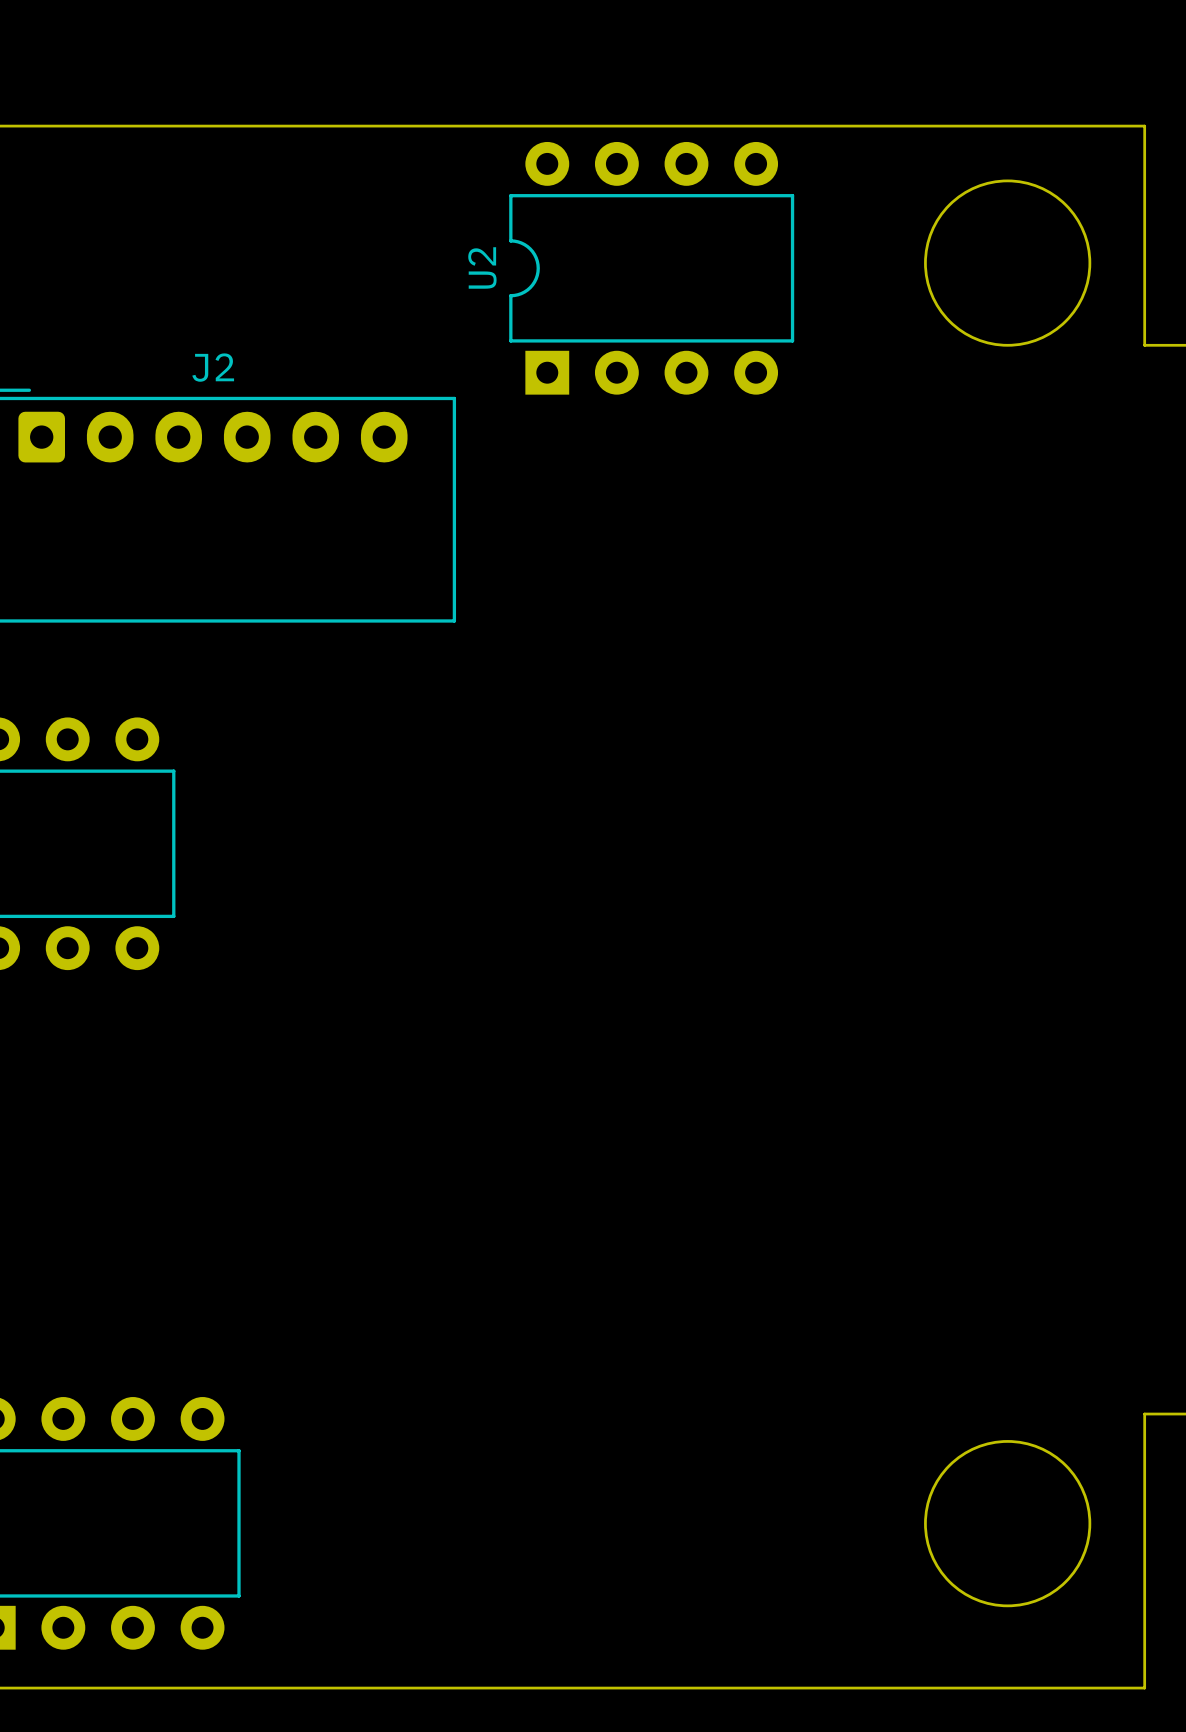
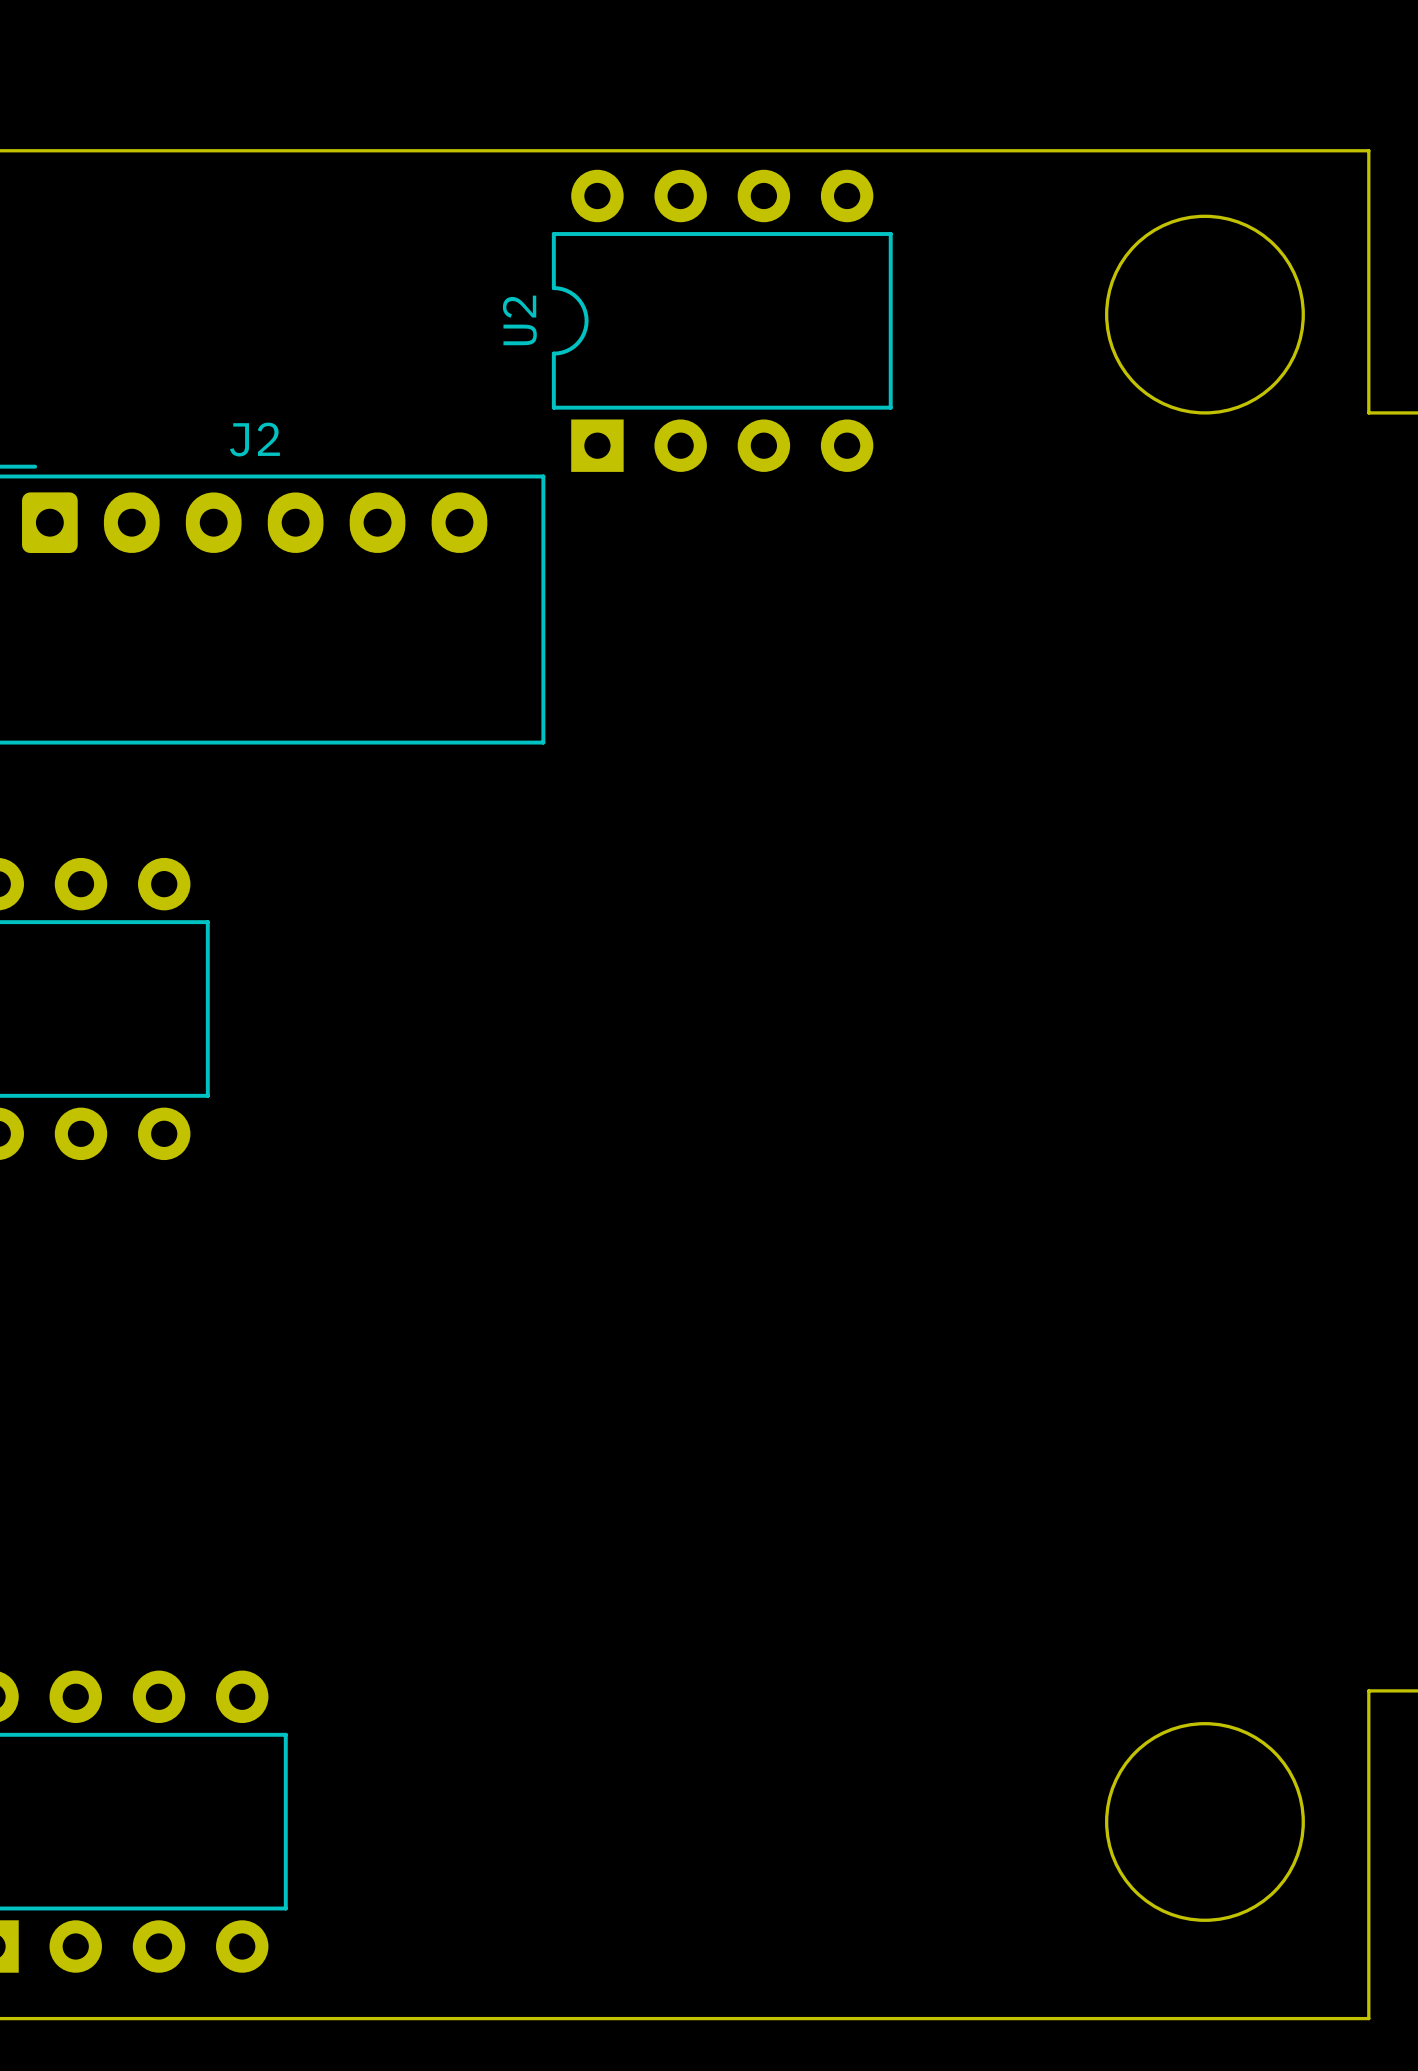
U2 position: (651, 268) -> (722, 320)

